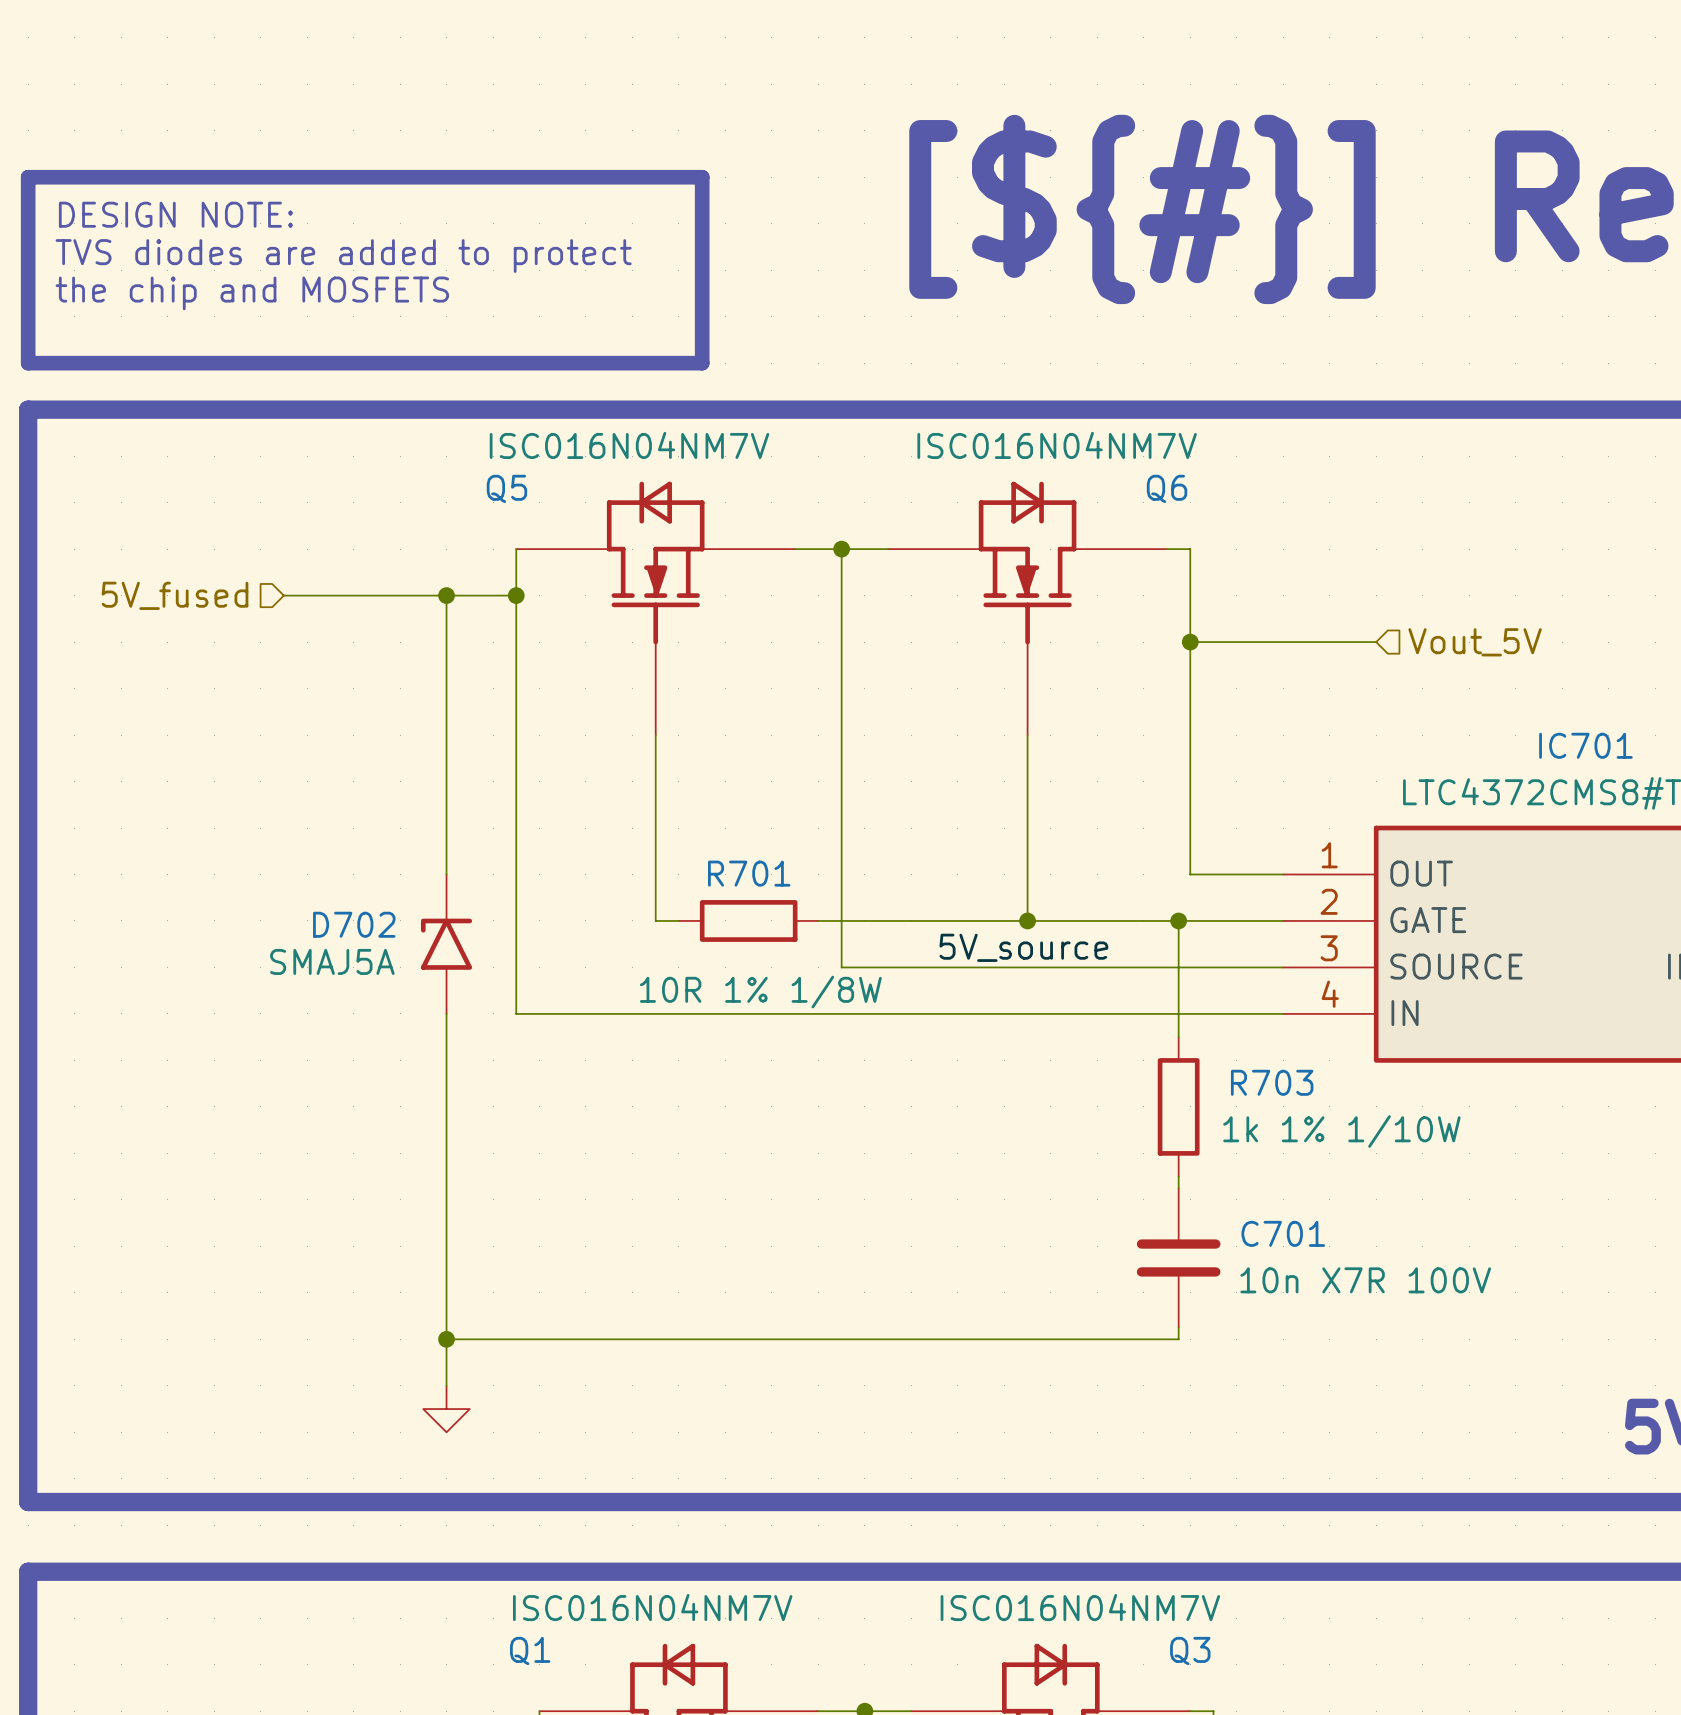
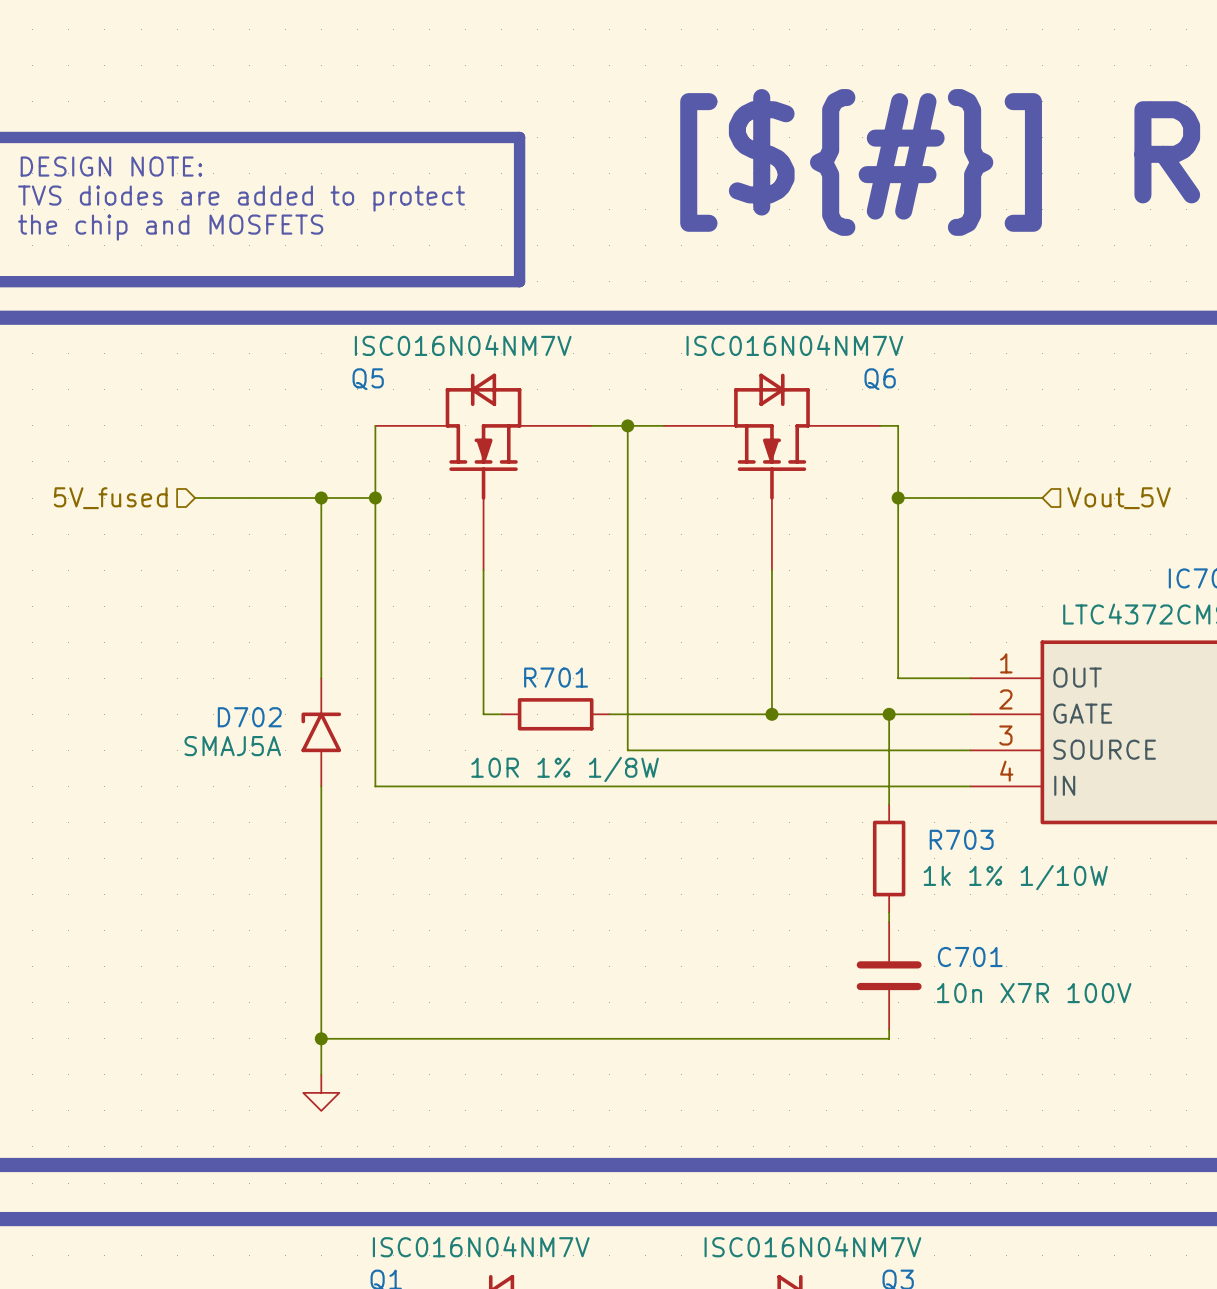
hierarchical label position: 5V_fused (175, 595) -> 5V_fused (110, 498)
wire: (283, 595) (516, 595) -> (195, 498) (375, 498)
wire: (446, 595) (446, 642) -> none
junction: (446, 595) -> none
junction: (516, 595) -> none
junction: none -> (321, 498)
junction: none -> (375, 498)
label: 5V_source (1023, 947) -> none

